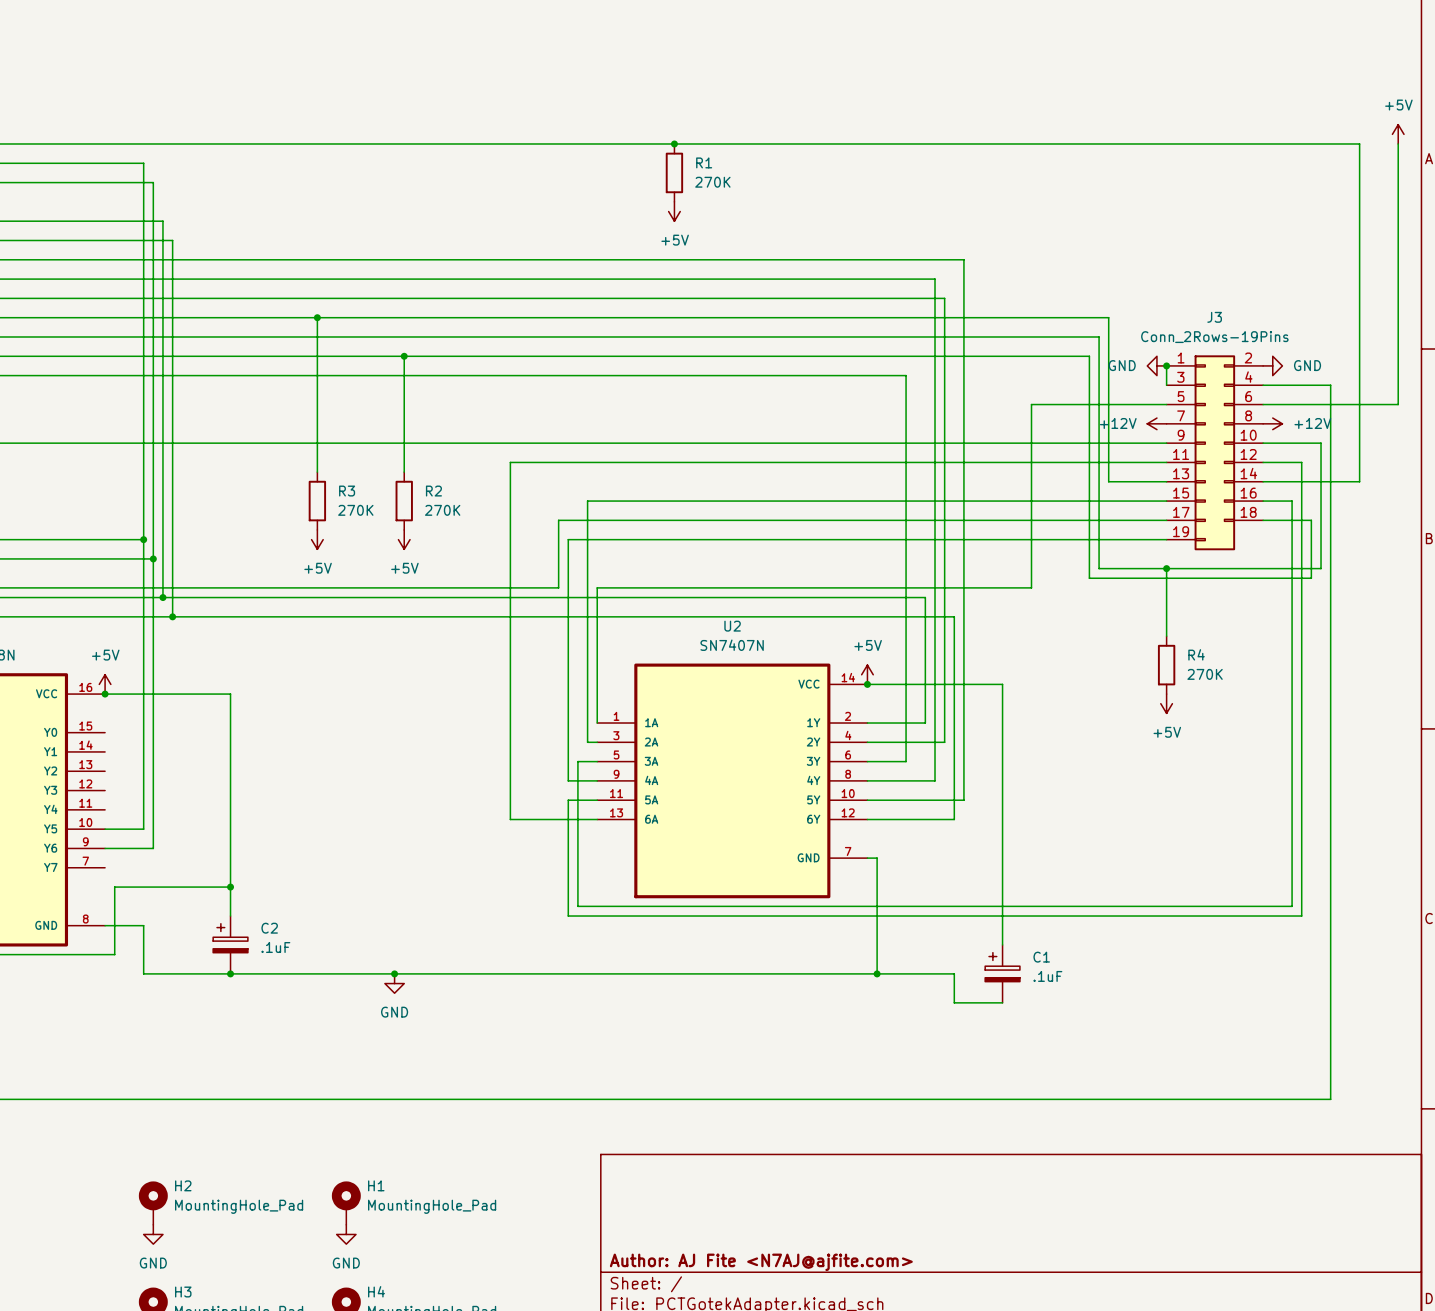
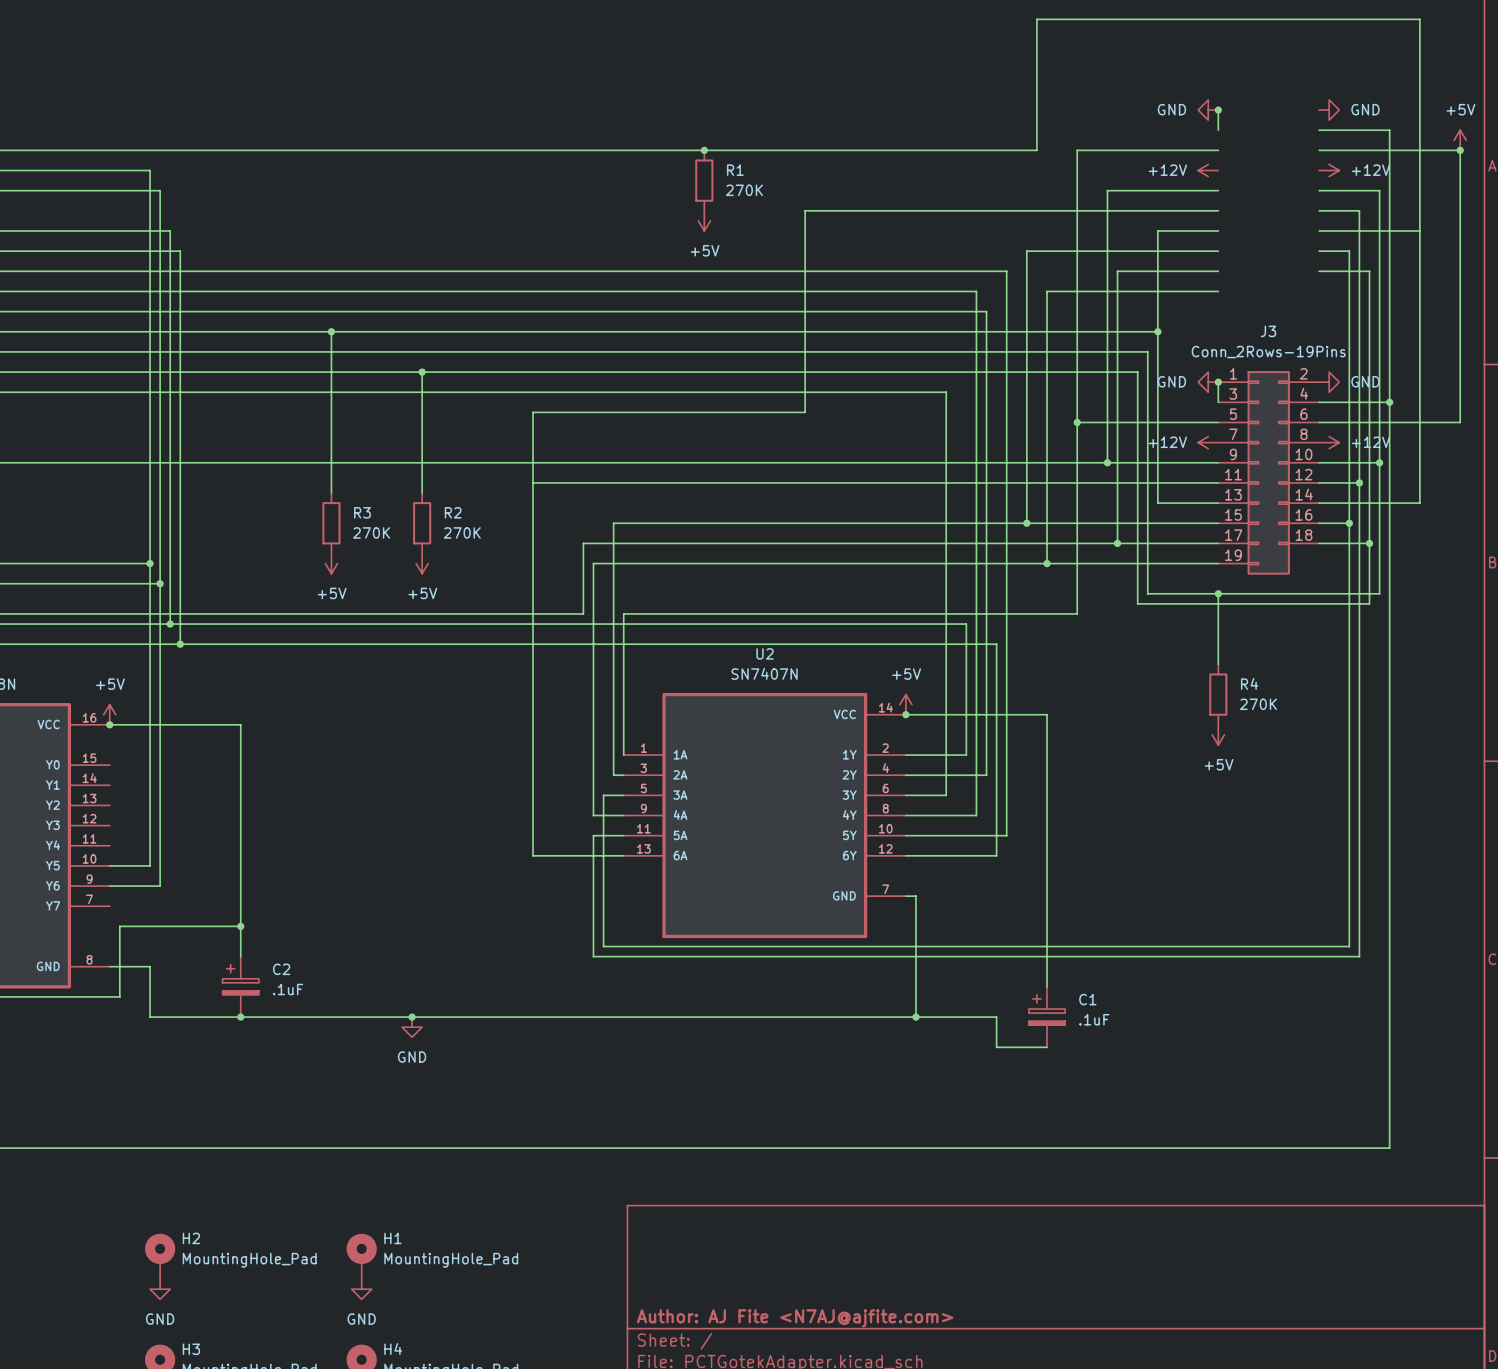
power symbol: none -> GND (1208, 110)
wire: none -> (1218, 110) (1218, 130)
junction: none -> (1218, 110)
power symbol: none -> GND (1329, 110)
wire: none -> (1319, 130) (1389, 130) (1389, 402)
wire: (992, 143) (1031, 143) -> (1077, 422) (1077, 150)
wire: none -> (1036, 150) (1036, 19) (1419, 19) (1419, 150) (1460, 150)
wire: (1166, 143) (1263, 143) -> (1319, 230) (1419, 230)
junction: none -> (1460, 150)
power symbol: none -> +12V (1208, 170)
power symbol: none -> +12V (1329, 170)
wire: none -> (1218, 190) (1107, 190) (1107, 462)
wire: none -> (1319, 190) (1379, 190) (1379, 462)
wire: none -> (1218, 210) (805, 210) (805, 412) (533, 412) (533, 482)
wire: none -> (1319, 210) (1359, 210) (1359, 482)
wire: none -> (1218, 230) (1157, 230) (1157, 331)
wire: none -> (1218, 251) (1026, 251) (1026, 523)
wire: none -> (1319, 251) (1349, 251) (1349, 523)
wire: none -> (1218, 271) (1117, 271) (1117, 543)
wire: none -> (1319, 271) (1369, 271) (1369, 543)
wire: none -> (1218, 291) (1046, 291) (1046, 563)
junction: none -> (1157, 331)
junction: none -> (1389, 402)
junction: none -> (1077, 422)
junction: none -> (1107, 462)
junction: none -> (1379, 462)
junction: none -> (1359, 482)
junction: none -> (1026, 523)
junction: none -> (1349, 523)
junction: none -> (1117, 543)
junction: none -> (1369, 543)
junction: none -> (1046, 563)

